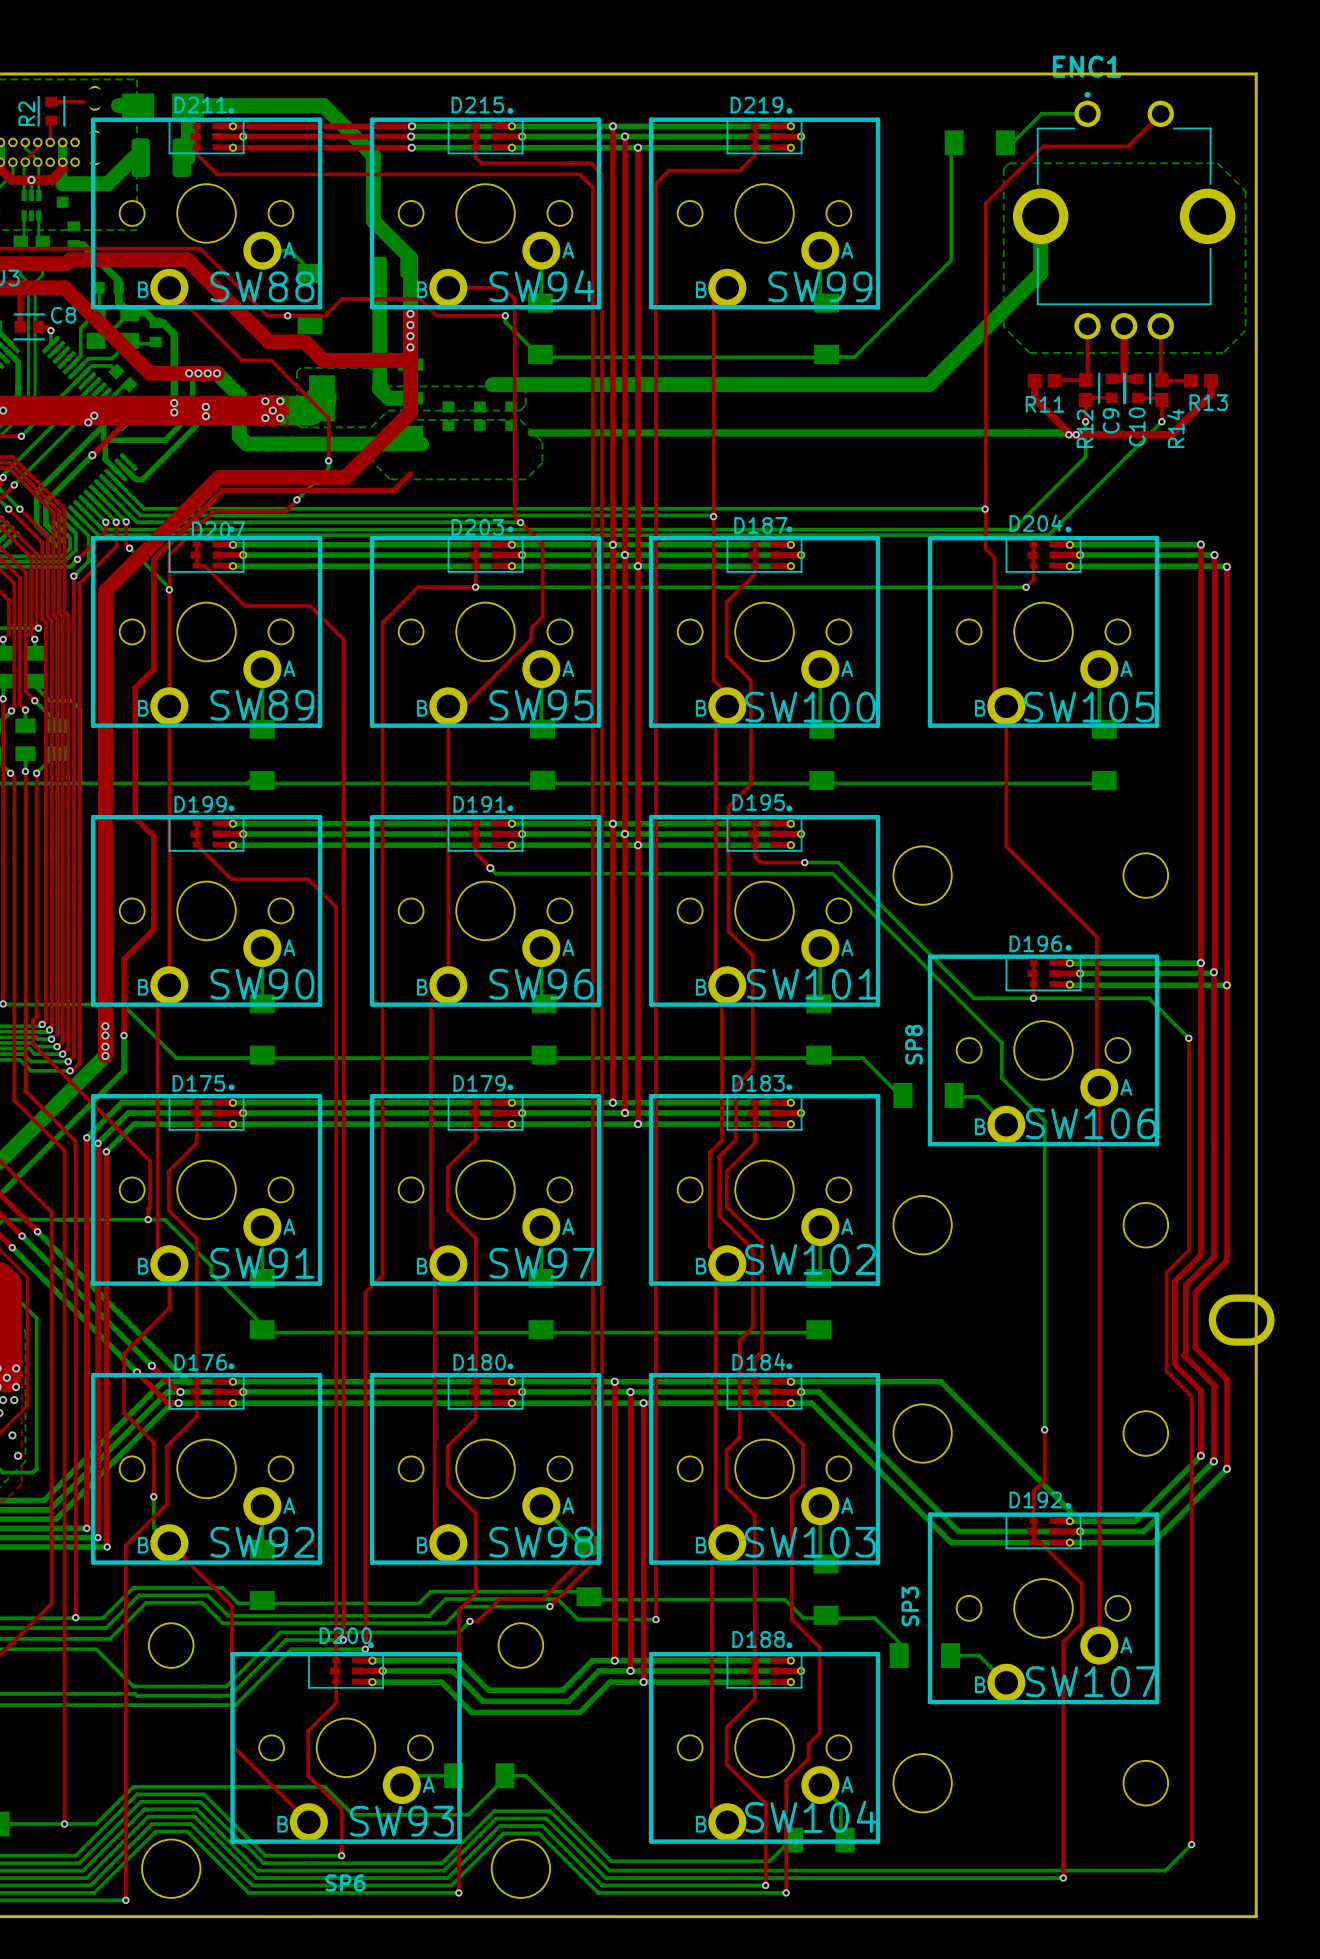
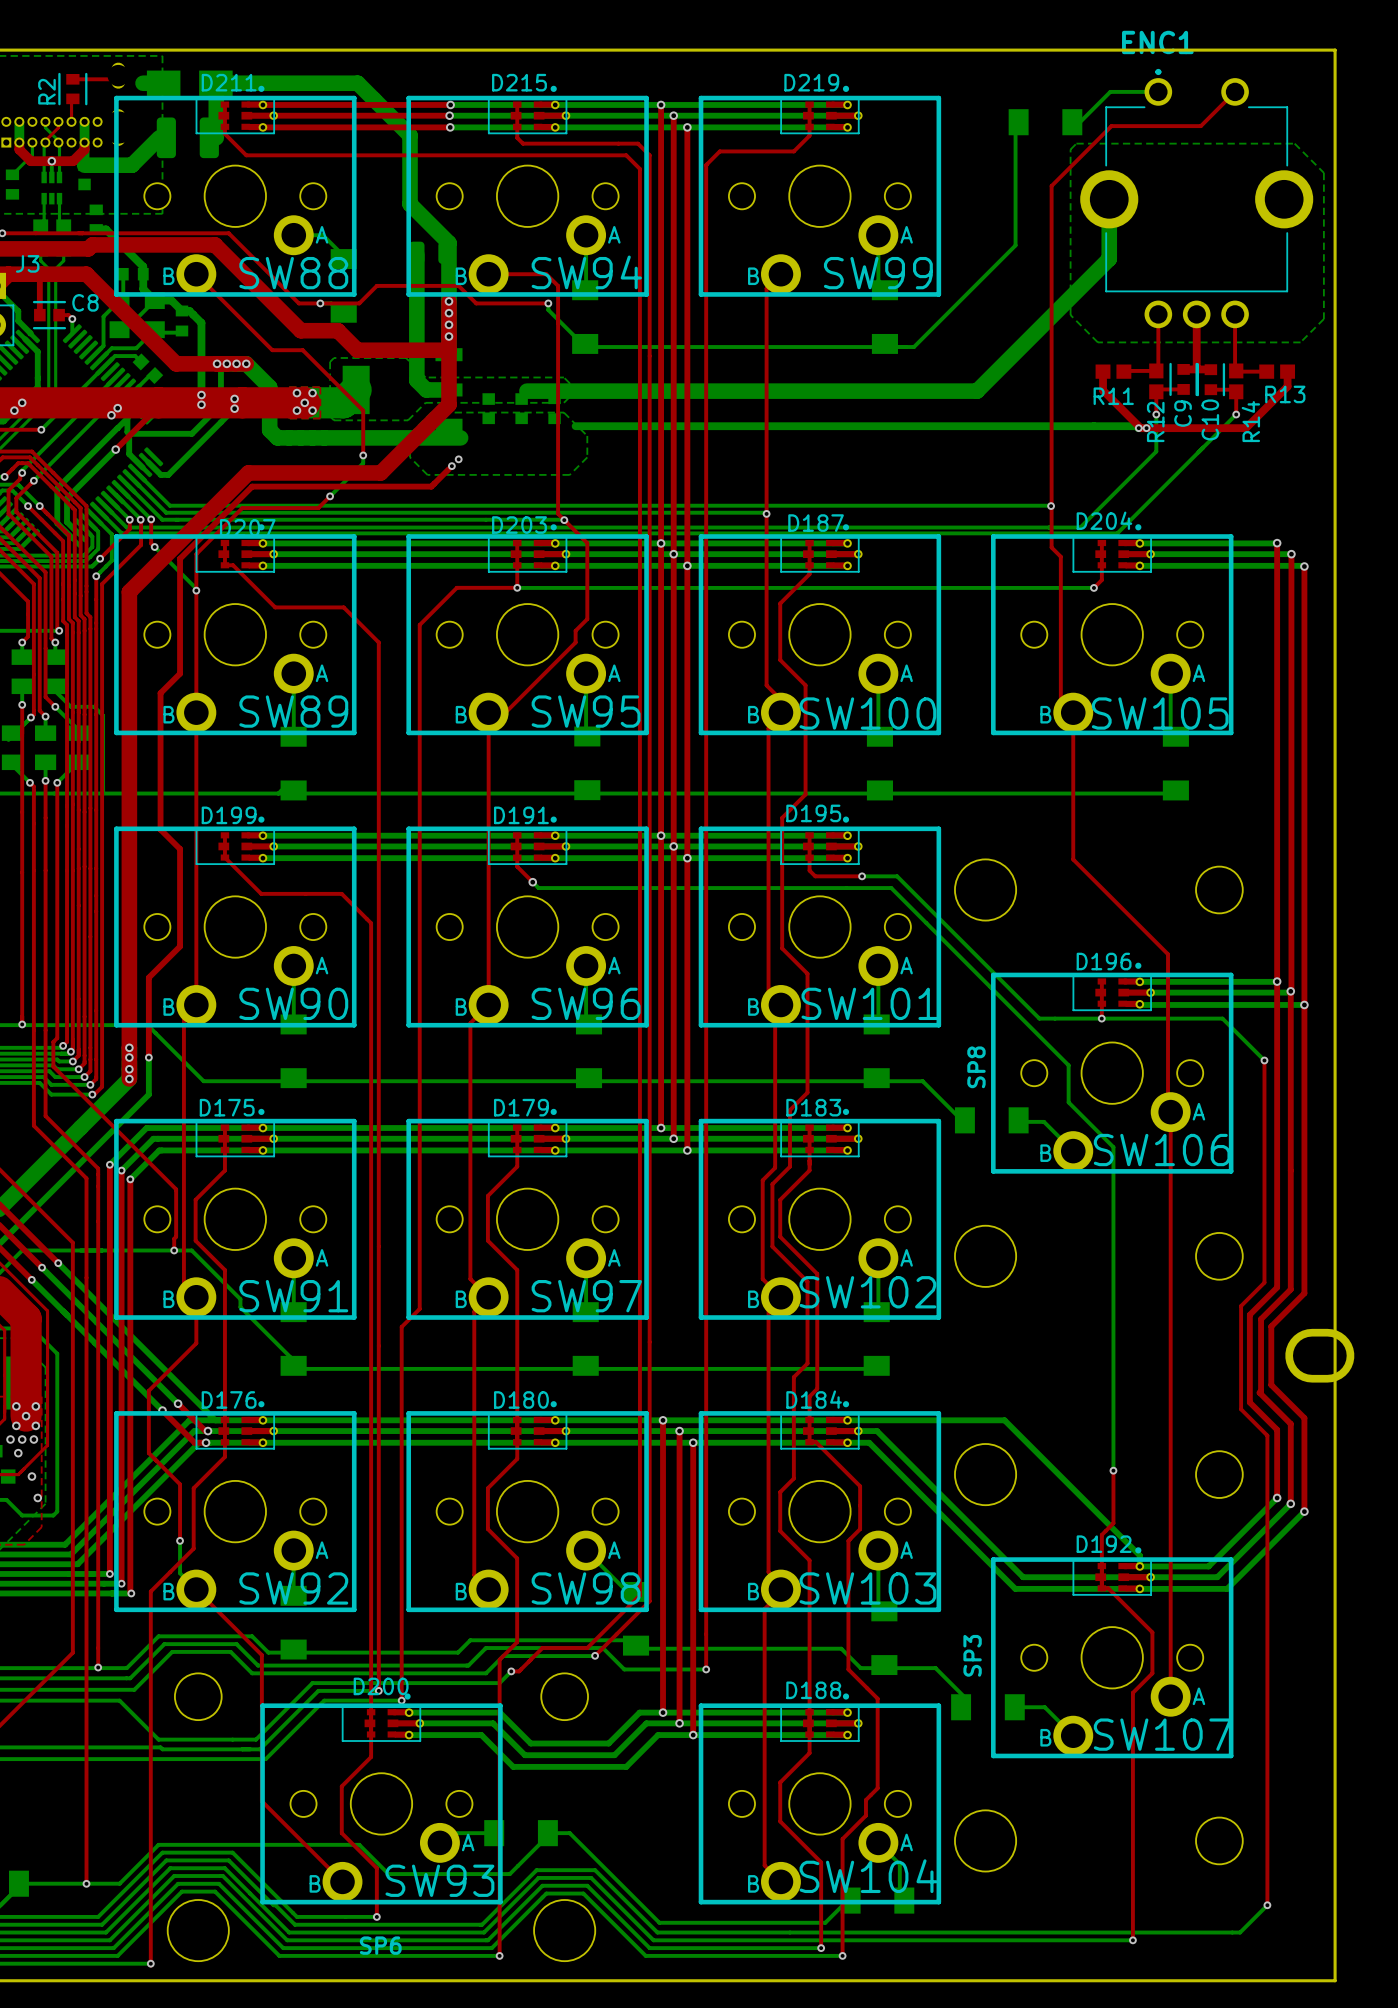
bottom track: (492, 384) (929, 384) -> (526, 391) (977, 391) (992, 375)
via: none -> (458, 459)
via: none -> (451, 466)

